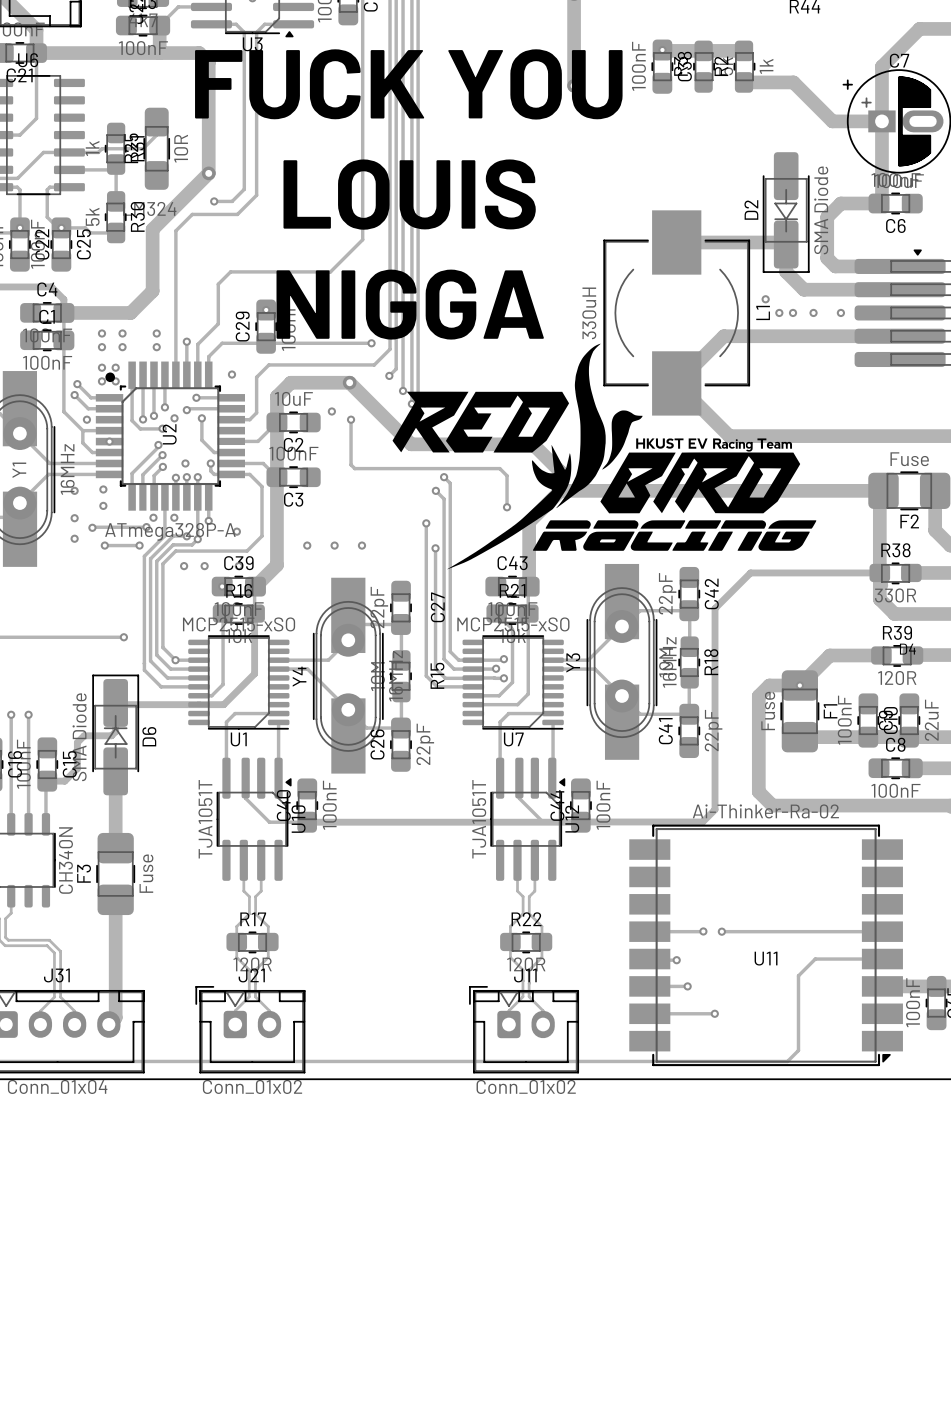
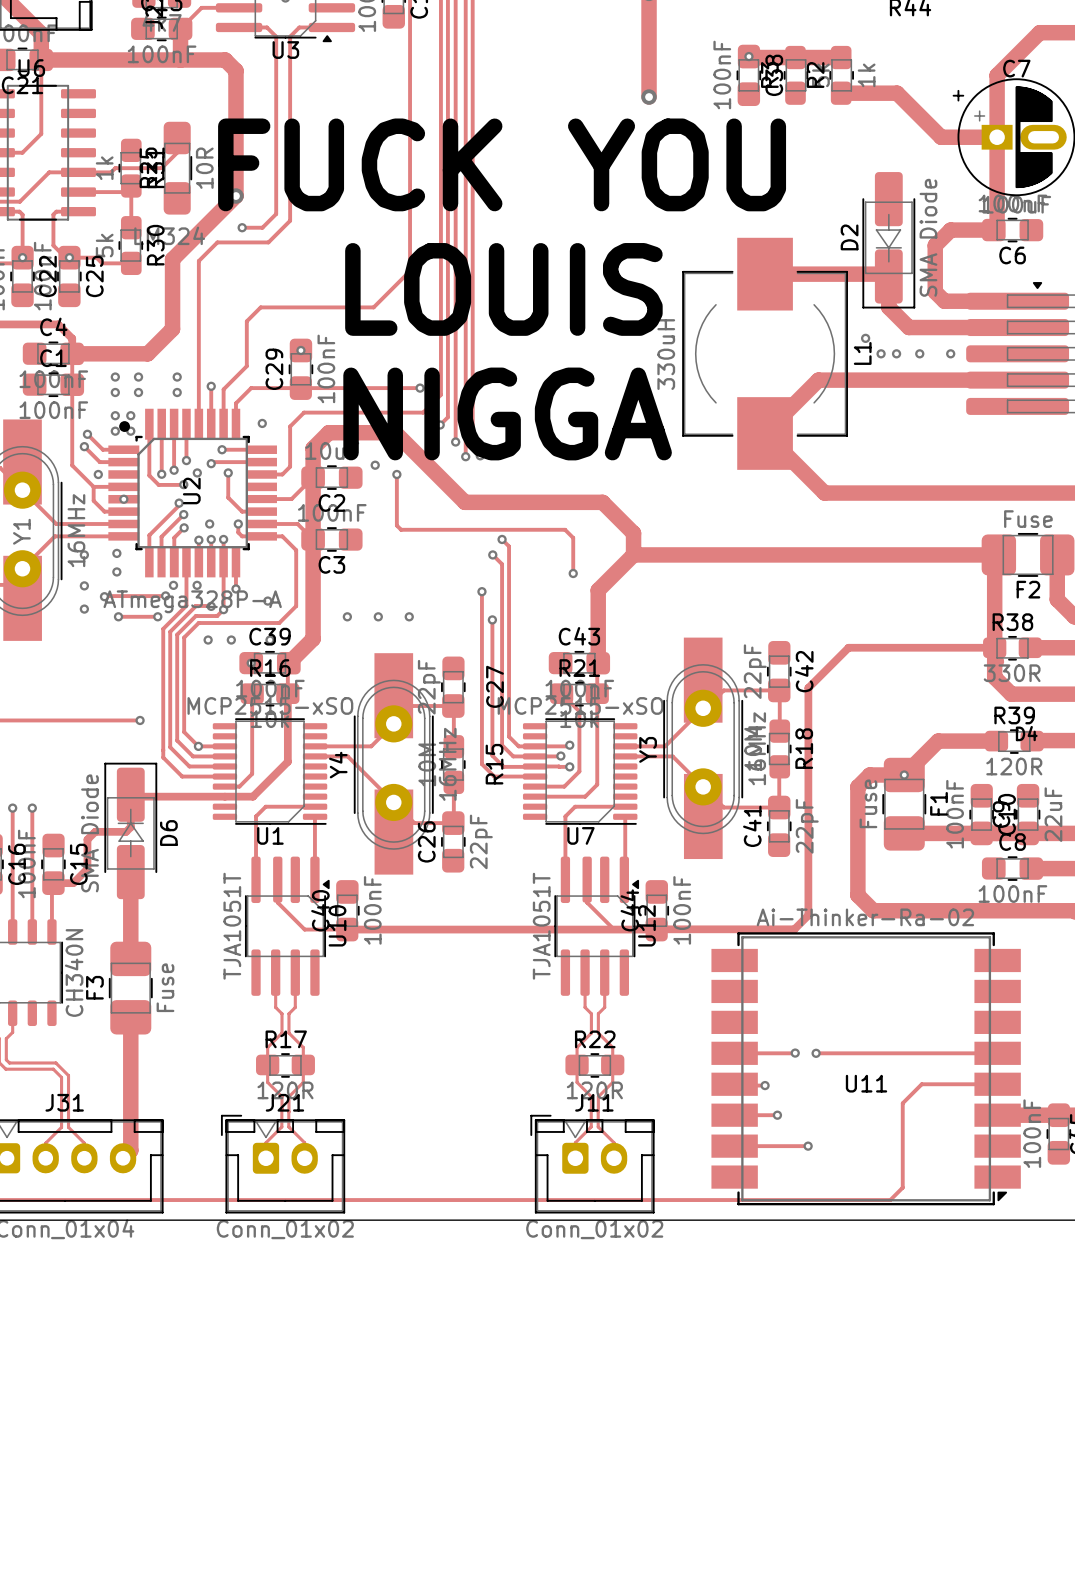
text position: FUCK YOU (408, 84) -> FUCK YOU (502, 164)
text position: LOUIS (409, 194) -> LOUIS (503, 289)
text position: NIGGA (410, 304) -> NIGGA (507, 413)
drawing: [392, 343, 817, 570] -> none

